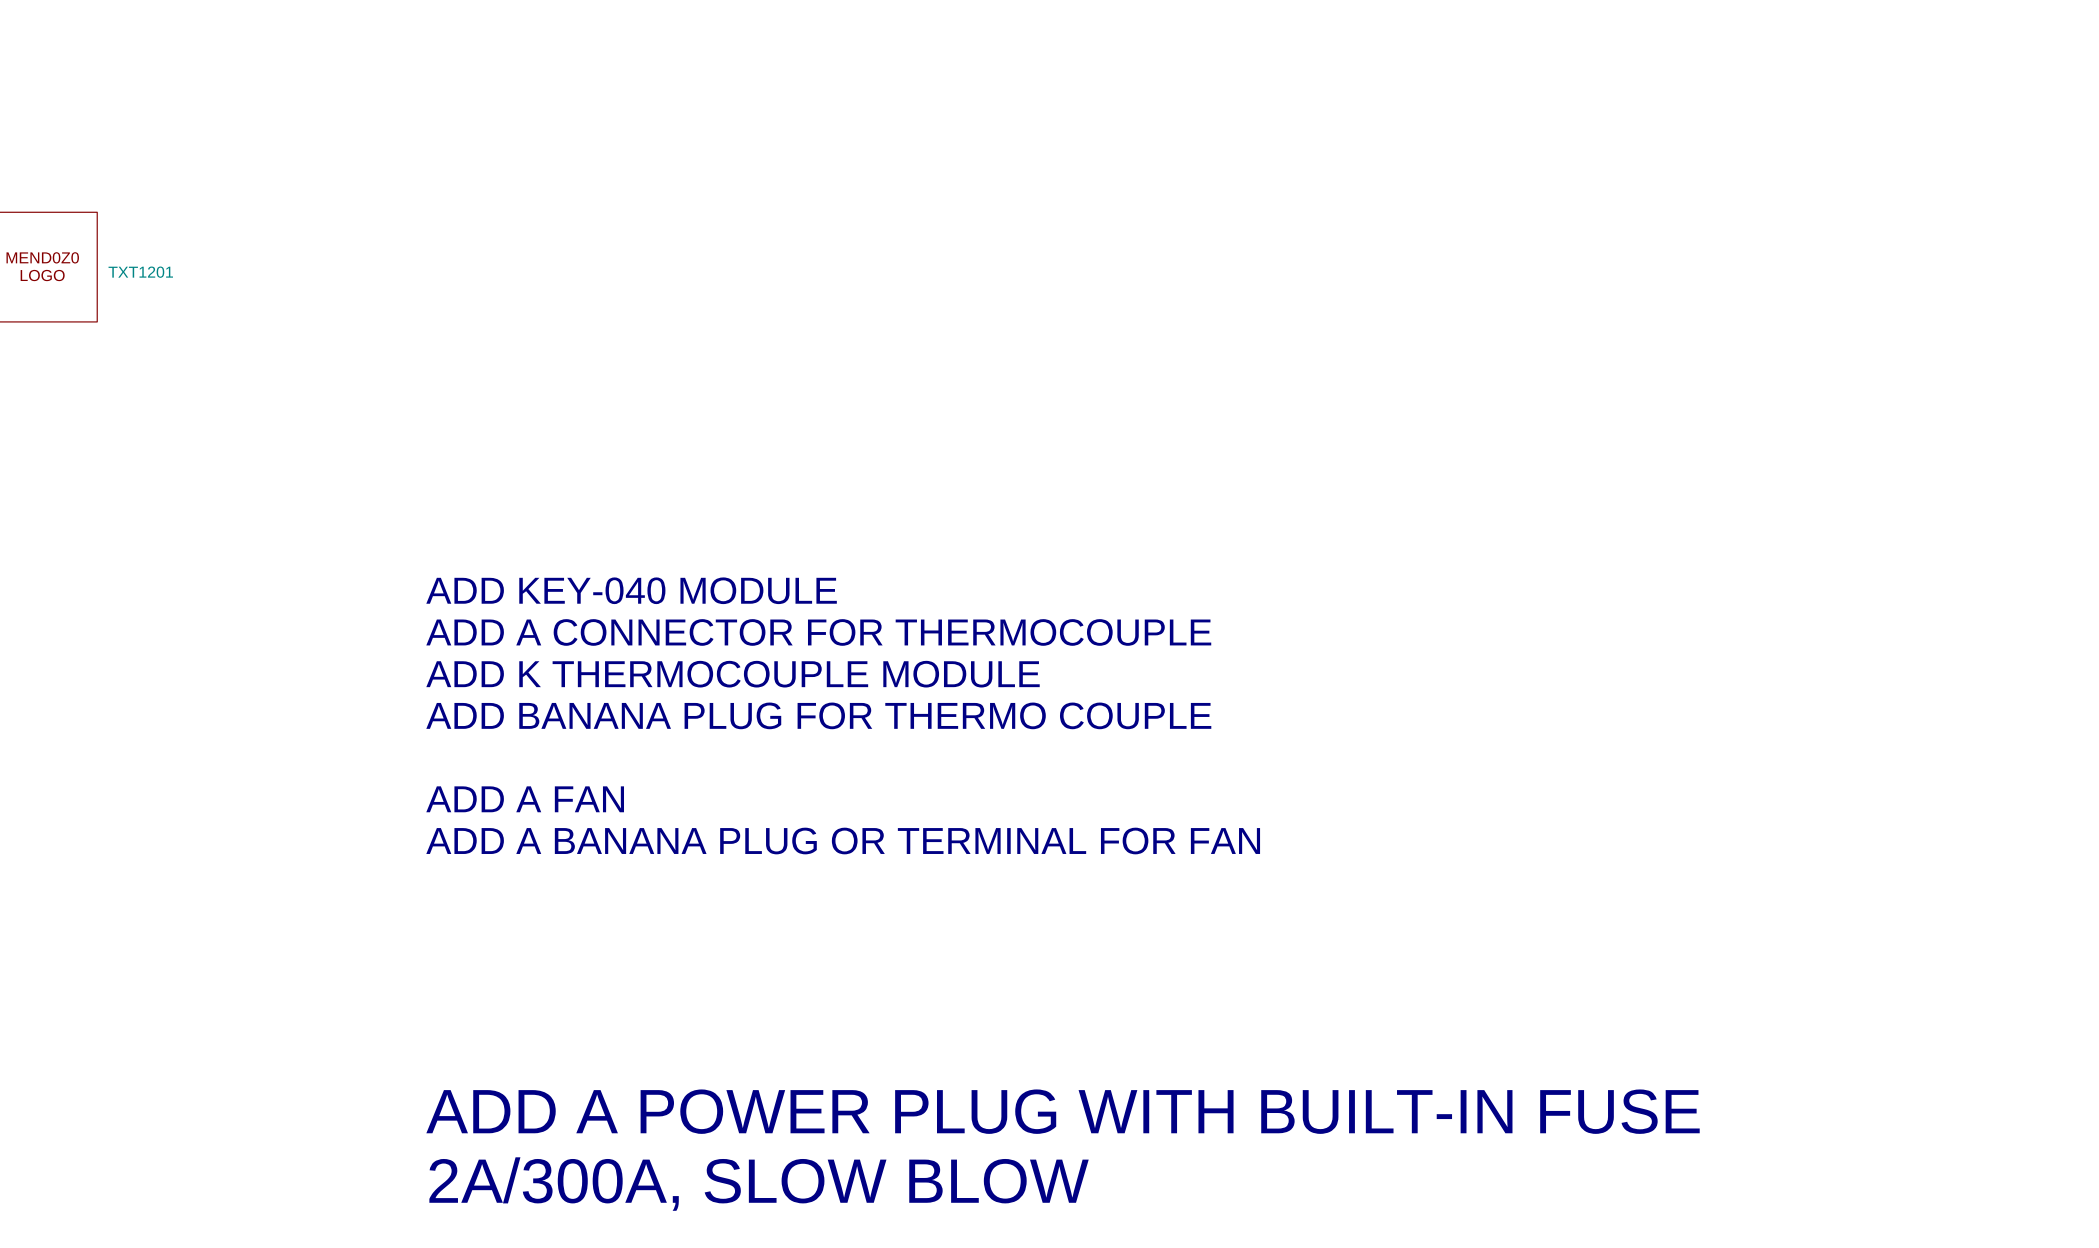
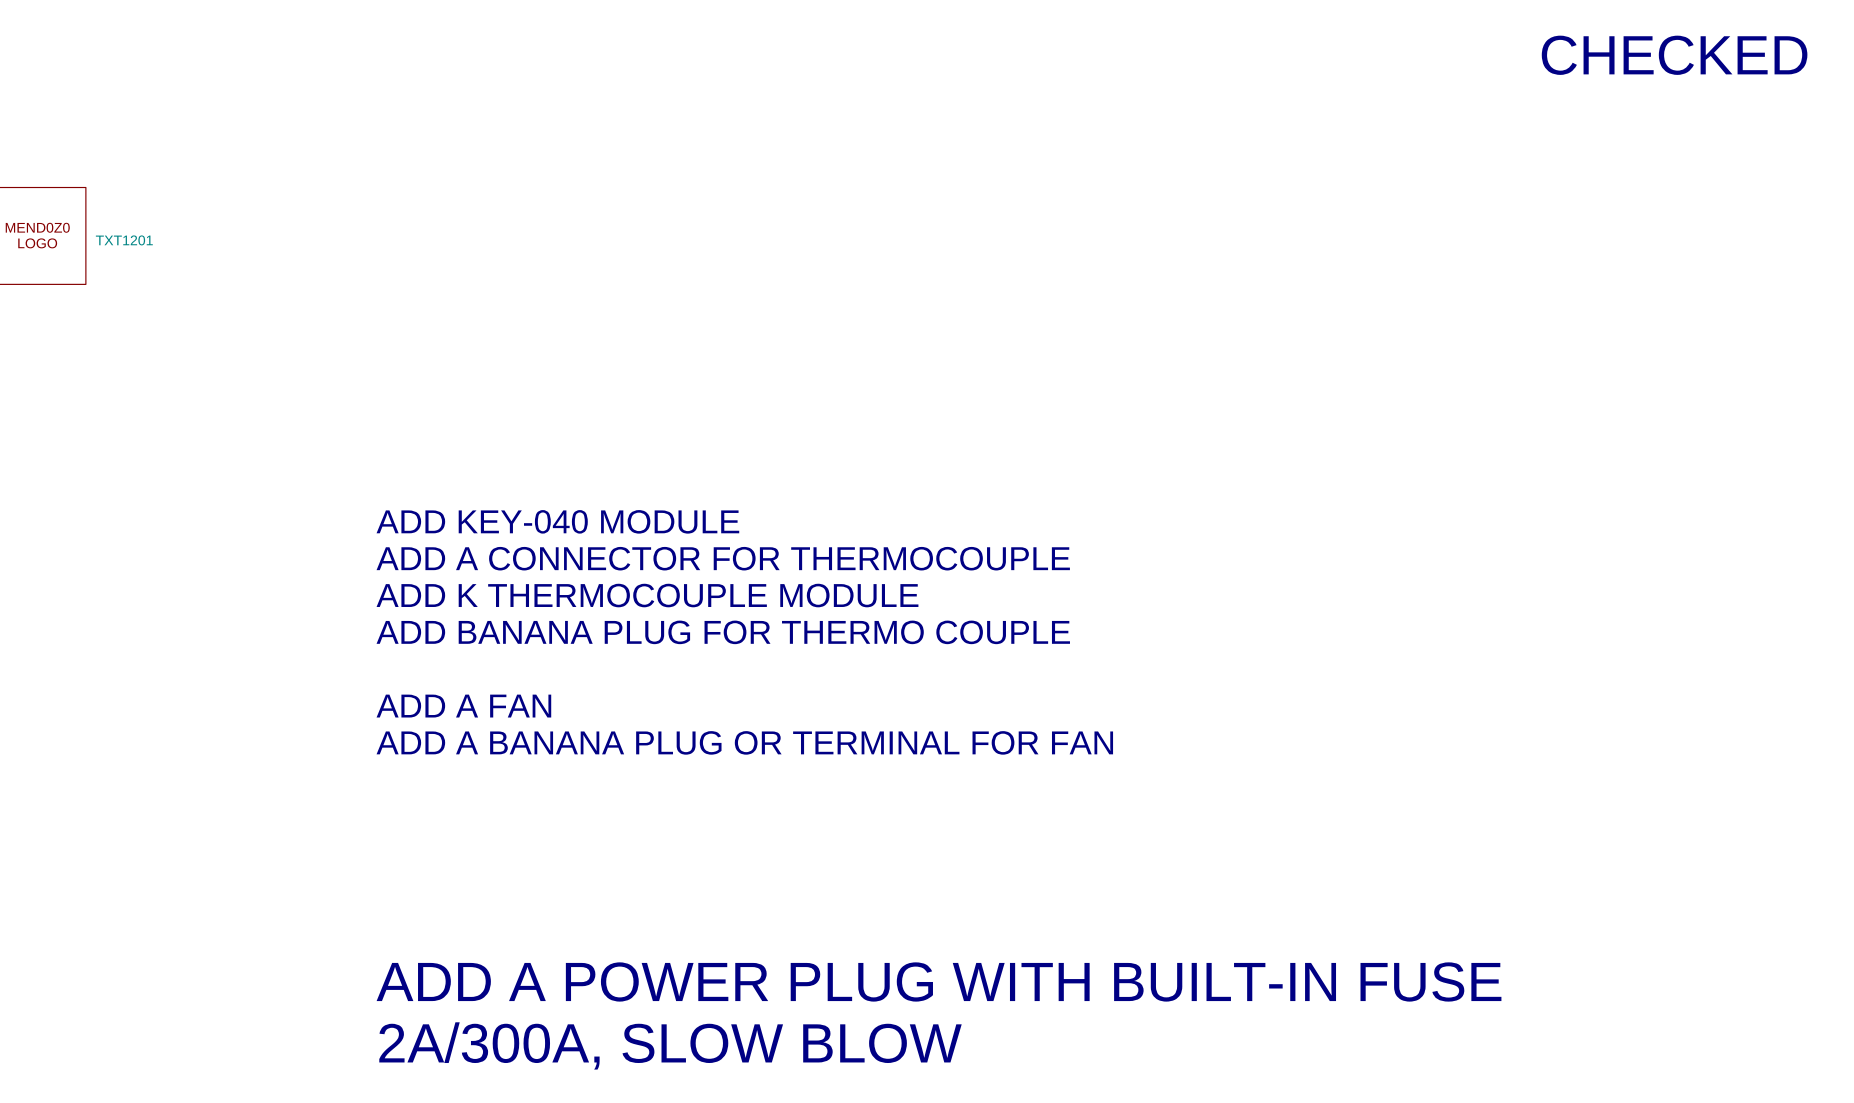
text: none -> CHECKED (1674, 55)

